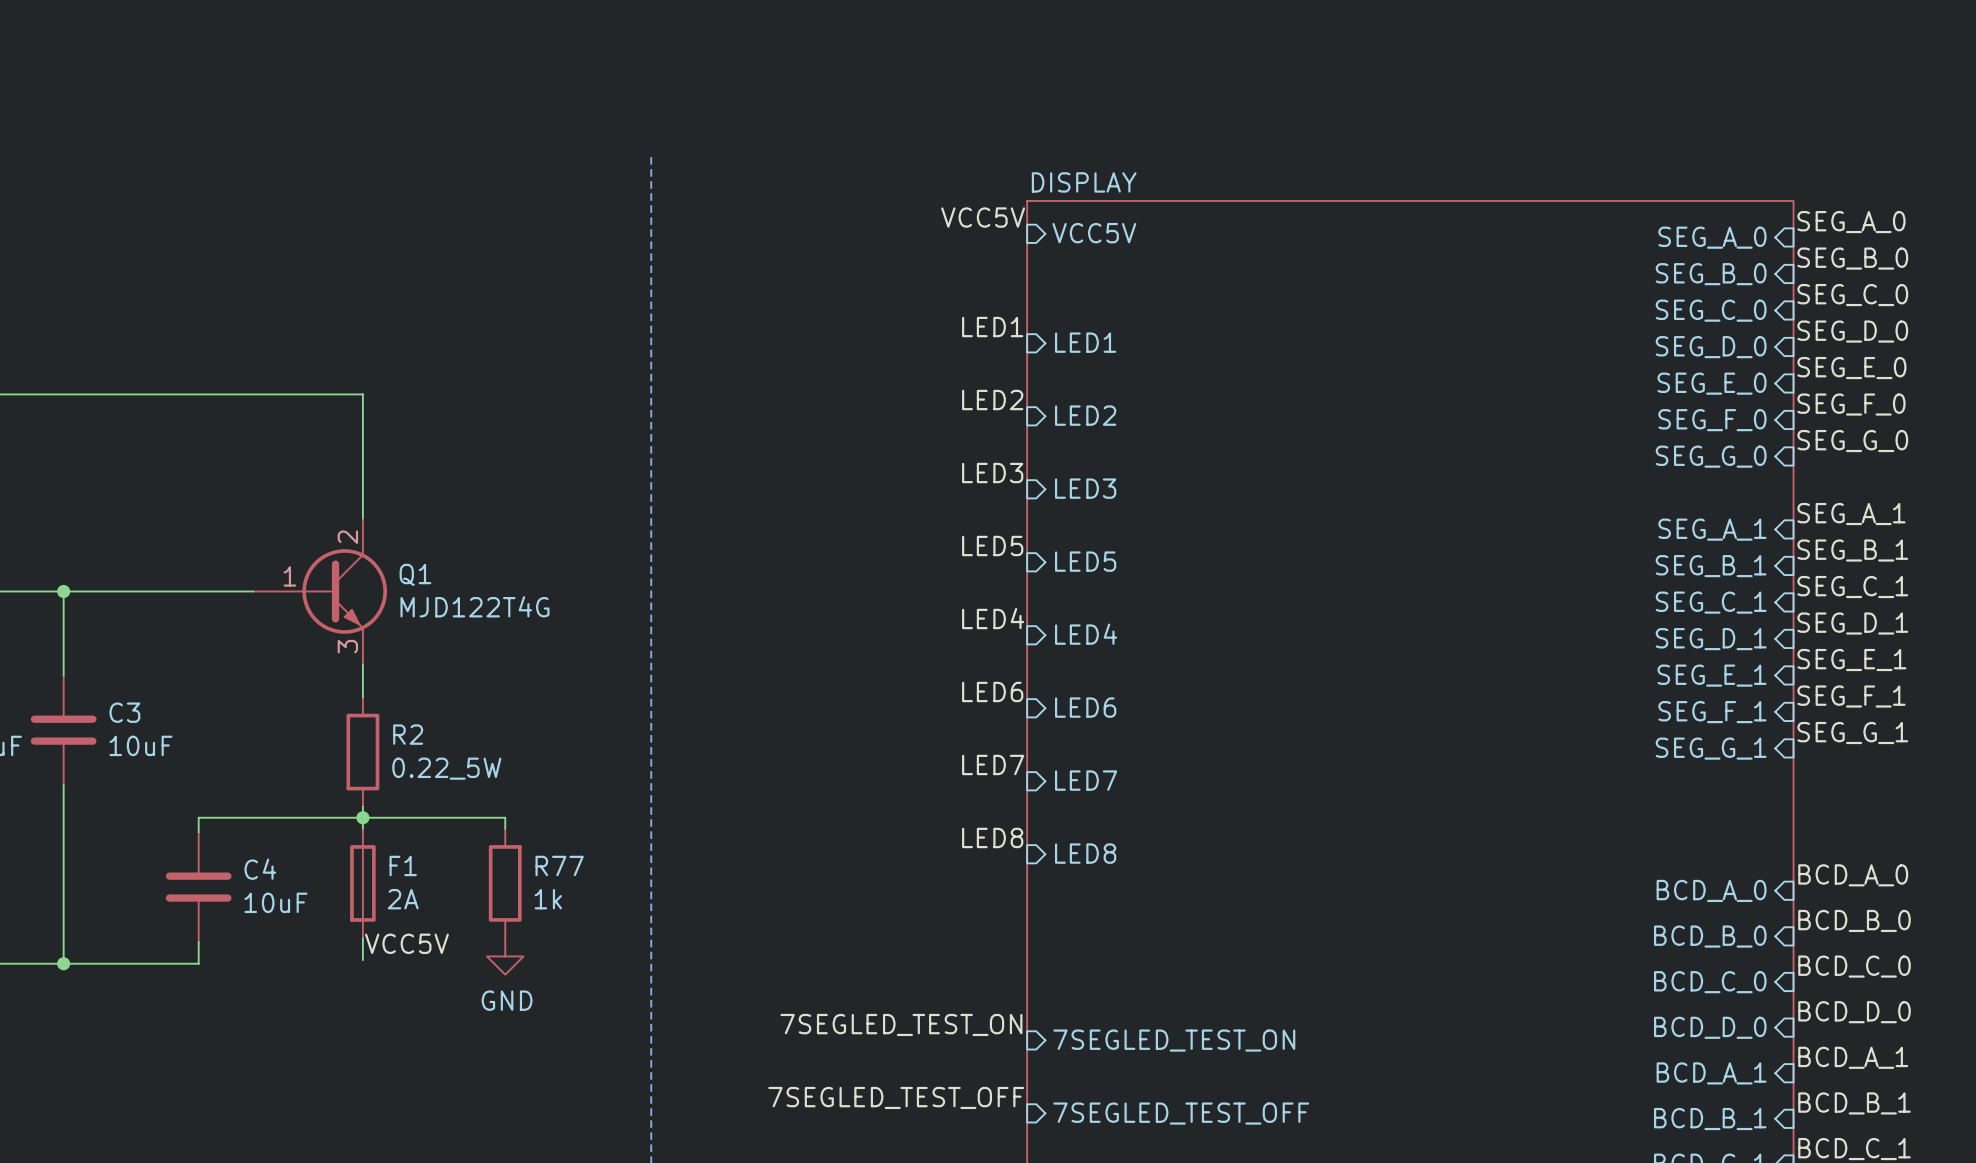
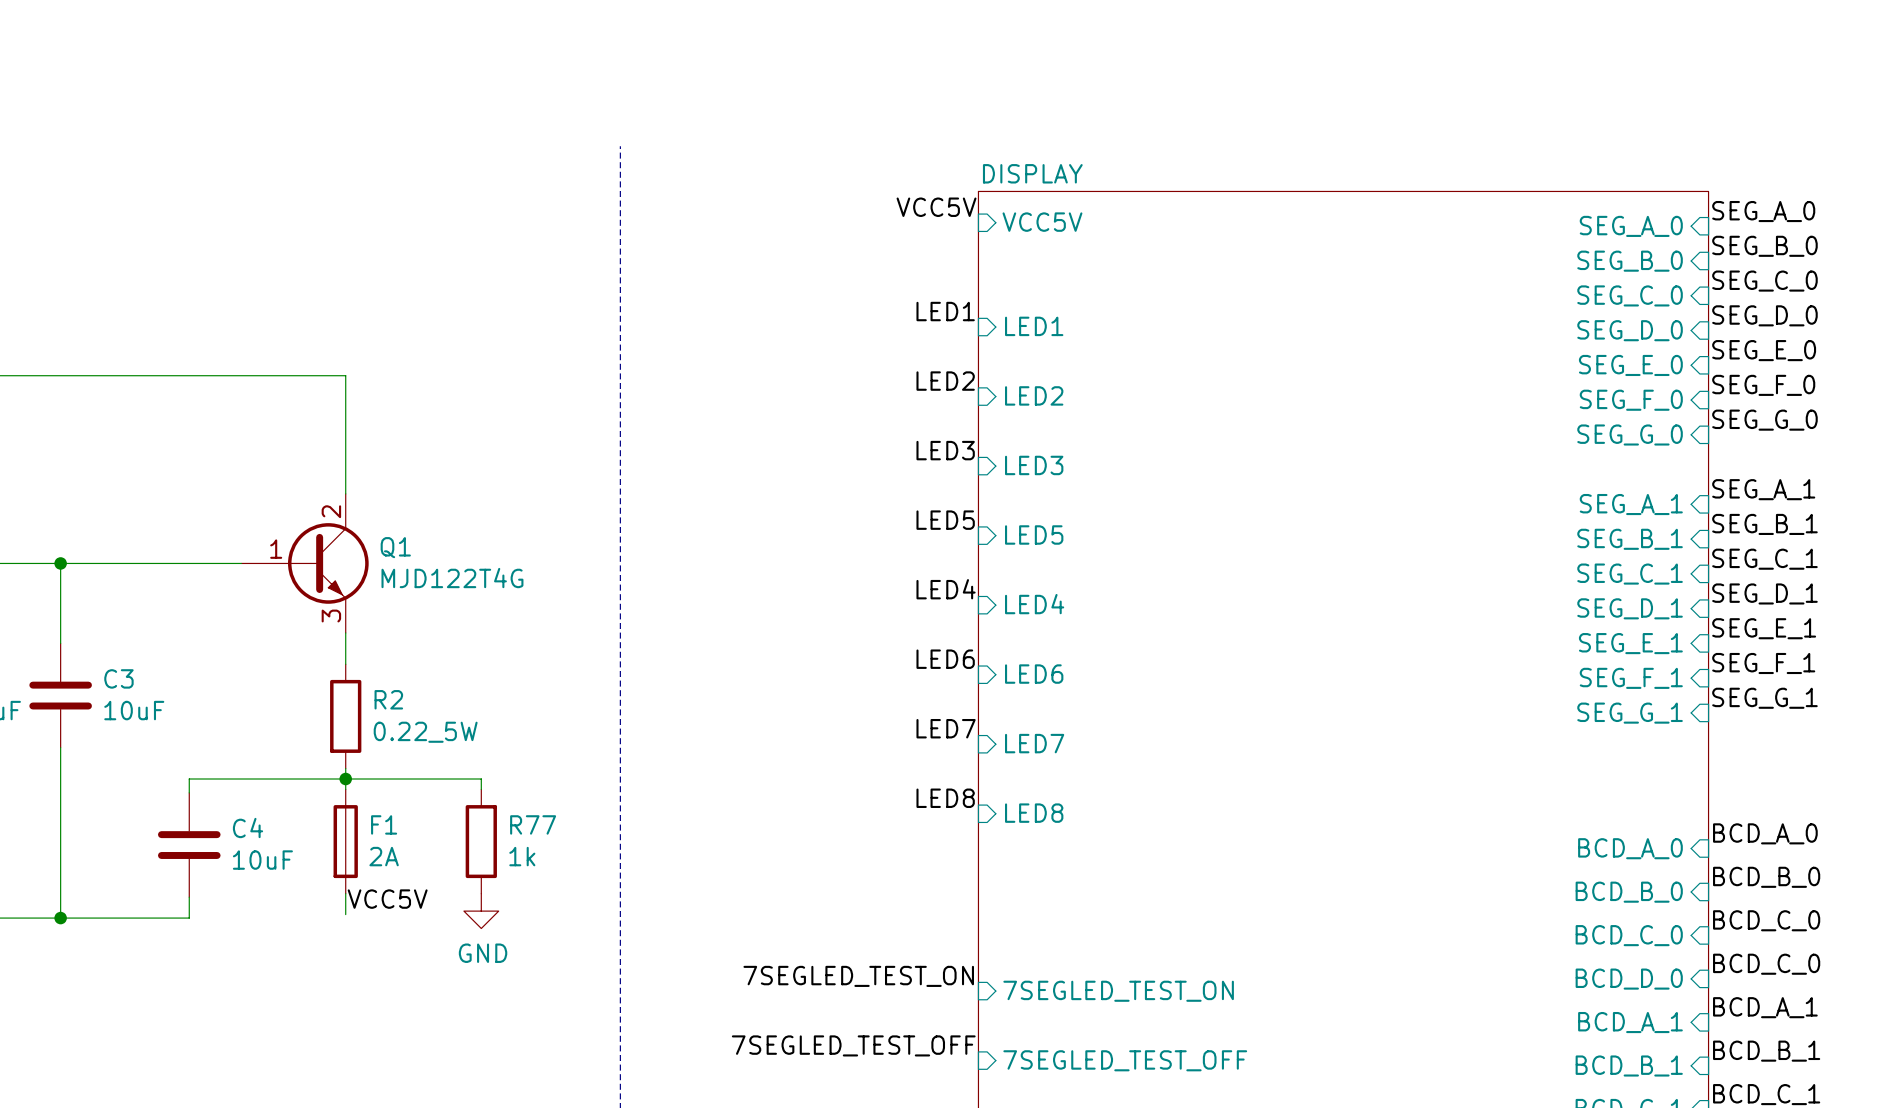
label: BCD_D_0 (1854, 1012) -> BCD_C_0 (1766, 964)

